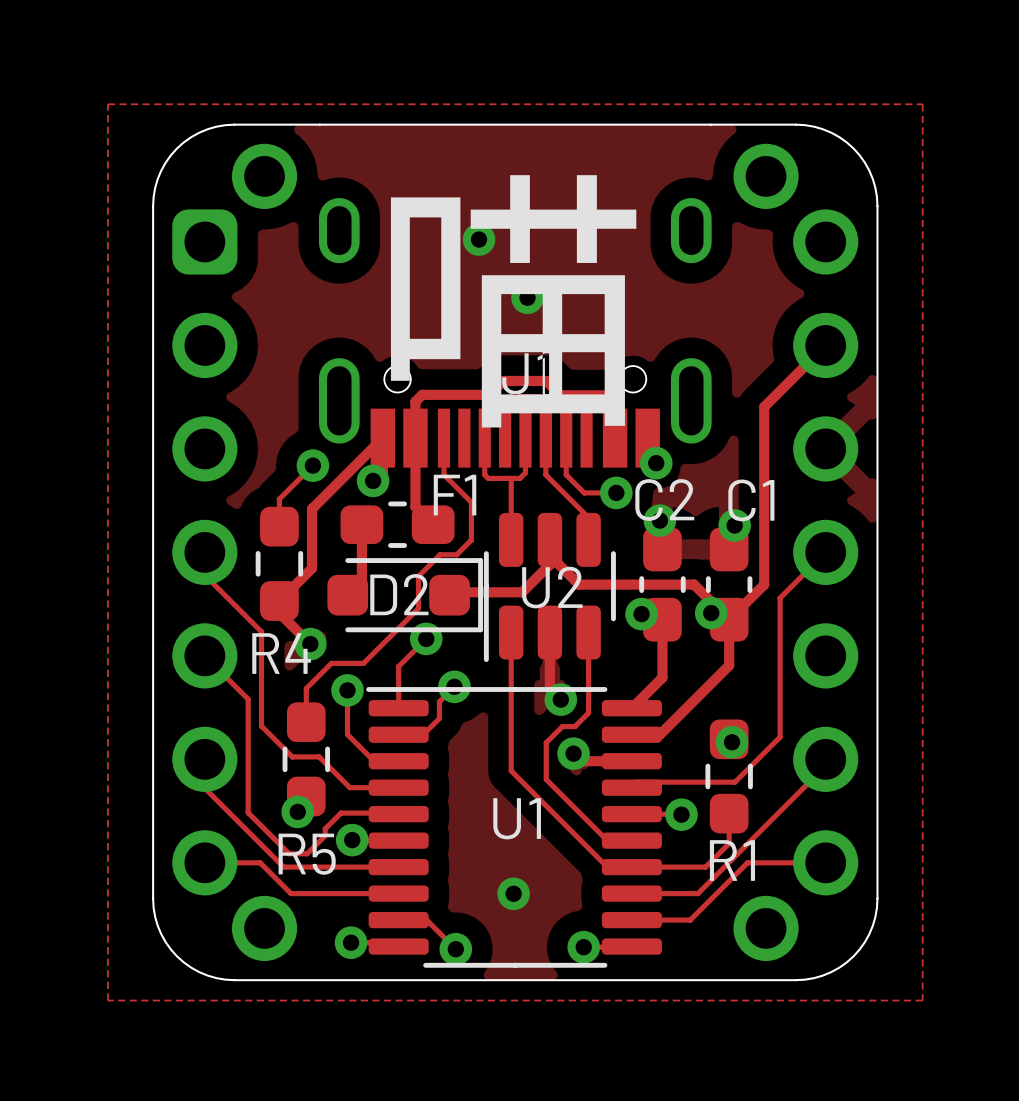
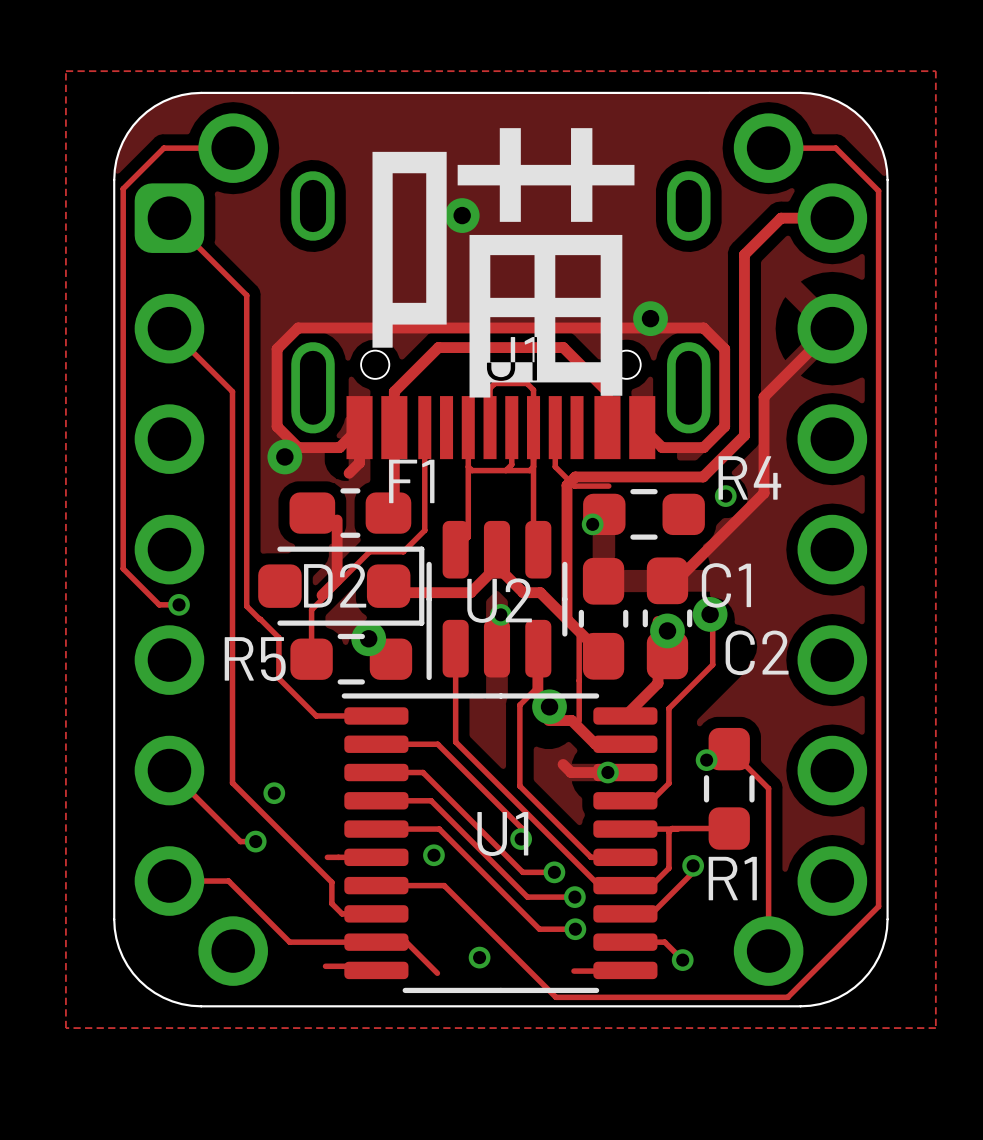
track: none -> (233, 148) (163, 148) (123, 188) (123, 568) (159, 604) (179, 604)
track: none -> (768, 148) (835, 148) (878, 190) (878, 906) (787, 997) (555, 997) (444, 885) (376, 885)
track: none -> (169, 218) (246, 295) (246, 606) (259, 619)
track: none -> (832, 218) (781, 218) (744, 254) (744, 435) (703, 476) (575, 476) (567, 485) (567, 619)
via: (527, 297) -> none
text position: 喵 (513, 301) -> 喵 (503, 262)
via: none -> (650, 318)
track: none -> (169, 328) (232, 391) (232, 782) (331, 882) (331, 903) (342, 913)
track: (415, 404) (415, 401) (422, 394) (489, 394) (503, 380) (546, 380) (560, 395) (608, 395) (615, 401) (615, 404) -> (394, 391) (438, 347) (563, 347) (607, 391)
track: (764, 406) (764, 584) (729, 619) -> (766, 394) (764, 396) (764, 493) (676, 580) (667, 580)
track: (364, 456) (312, 509) (312, 568) (279, 600) (279, 613) (310, 644) -> (339, 447) (298, 447) (277, 426) (277, 349) (298, 327) (703, 327) (724, 349) (724, 426) (703, 447) (662, 447) (642, 427)
via: (656, 463) -> none
track: (312, 465) (279, 499) (279, 526) -> none
track: (444, 474) (471, 502) (471, 540) (456, 554) (440, 554) (418, 576) (418, 608) (363, 663) (331, 663) (306, 688) (306, 722) -> (424, 466) (424, 530) (403, 551) (369, 551) (311, 609) (311, 659)
track: none -> (468, 466) (468, 537) (455, 549)
track: (545, 474) (588, 517) (588, 539) -> none
track: (511, 478) (511, 539) -> none
track: none -> (505, 470) (529, 470) (533, 466) (533, 544) (538, 549)
via: (373, 480) -> none
via: (616, 492) -> none
C2 name position: C2 (664, 499) -> C2 (757, 652)
C1 name position: C1 (751, 500) -> C1 (726, 585)
via: (659, 520) -> none
F1 position: (397, 524) -> (350, 513)
via position: (734, 525) -> (725, 496)
via: none -> (592, 524)
track: (549, 539) (549, 564) (522, 592) (452, 592) (449, 595) -> none
track: (204, 552) (204, 575) (261, 631) (261, 726) (292, 756) (319, 756) (349, 787) (398, 787) -> (574, 897) (527, 897) (431, 800) (376, 800)
track: (825, 552) (780, 598) (780, 737) (735, 782) (637, 782) (631, 787) -> (712, 619) (712, 664) (668, 708) (668, 783) (651, 800) (625, 800)
track: (549, 555) (578, 584) (694, 584) (729, 619) -> none
R4 rotation: 0° (279, 563) -> 90° clockwise (644, 514)
R4 position: (279, 563) -> (644, 514)
track: none -> (496, 566) (523, 592) (540, 592) (603, 655)
track: none -> (496, 566) (470, 592) (395, 592) (388, 586)
C2 position: (662, 584) -> (667, 618)
C1 position: (729, 584) -> (603, 618)
U2 position: (549, 587) -> (496, 600)
D2 position: (405, 595) -> (341, 586)
via: none -> (179, 604)
via: none -> (500, 614)
via position: (641, 614) -> (667, 630)
track: (729, 619) (729, 665) (659, 734) (631, 734) -> (548, 720) (571, 720) (595, 744) (625, 744)
track: (511, 632) (511, 770) -> (455, 648) (455, 742) (496, 782)
via: none -> (368, 638)
track: (426, 638) (398, 666) (398, 708) -> (260, 619) (278, 637) (278, 678) (316, 715) (376, 715)
via: (426, 638) -> none
via: (310, 644) -> none
R4 name position: R4 (281, 653) -> R4 (749, 477)
track: (204, 655) (248, 699) (248, 812) (289, 853) (307, 853) (325, 835) (325, 828) (341, 813) (398, 814) -> (575, 929) (539, 929) (439, 829) (376, 829)
track: (454, 686) (439, 701) (439, 718) (423, 734) -> (521, 839) (521, 827) (437, 744) (402, 744)
via: (454, 686) -> none
track: (347, 690) (347, 734) (374, 761) (398, 761) -> (554, 872) (522, 872) (423, 772) (376, 772)
via: (347, 690) -> none
track: (588, 712) (574, 726) (562, 726) (546, 742) (546, 779) (607, 840) -> (538, 648) (538, 686) (519, 705) (519, 786) (591, 857) (599, 857)
via position: (732, 742) -> (706, 760)
track: none -> (706, 760) (717, 749) (729, 749) (768, 788) (768, 951)
via: (573, 753) -> none
track: (204, 759) (204, 788) (283, 867) (398, 867) -> (169, 770) (240, 841) (255, 841)
R5 rotation: 0° (306, 759) -> 90° clockwise (351, 659)
R5 position: (306, 759) -> (351, 659)
track: (825, 759) (825, 765) (697, 893) (656, 893) -> (693, 865) (693, 872) (651, 913)
via: none -> (607, 772)
via: none -> (274, 793)
via size: [281, 795, 315, 829] -> [244, 830, 267, 853]
track: (729, 813) (729, 843) (705, 867) (656, 867) -> (729, 828) (672, 828) (668, 831) (668, 868) (651, 885)
via: (681, 814) -> none
via: none -> (521, 839)
via: none -> (433, 855)
via: (352, 840) -> none
via: none -> (693, 865)
via: none -> (554, 872)
track: (825, 862) (747, 862) (690, 920) (668, 920) -> (682, 960) (664, 942)
via: none -> (574, 897)
track: (290, 893) (366, 893) -> (261, 913) (289, 942) (376, 942)
via: (513, 893) -> none
via: none -> (575, 929)
via: none -> (479, 957)
via: none -> (682, 960)
via: (351, 942) -> none
via: (583, 947) -> none
via: (455, 949) -> none

